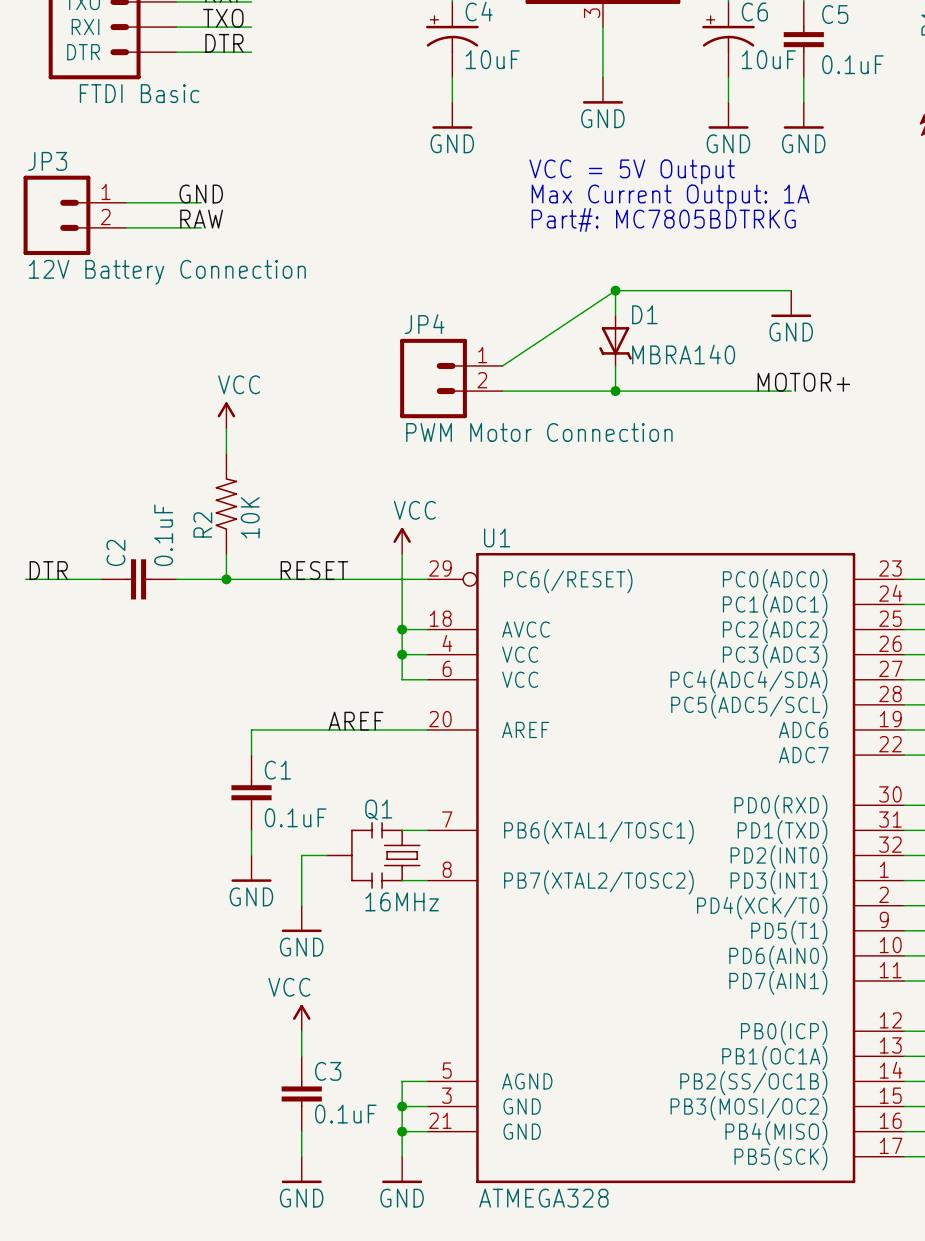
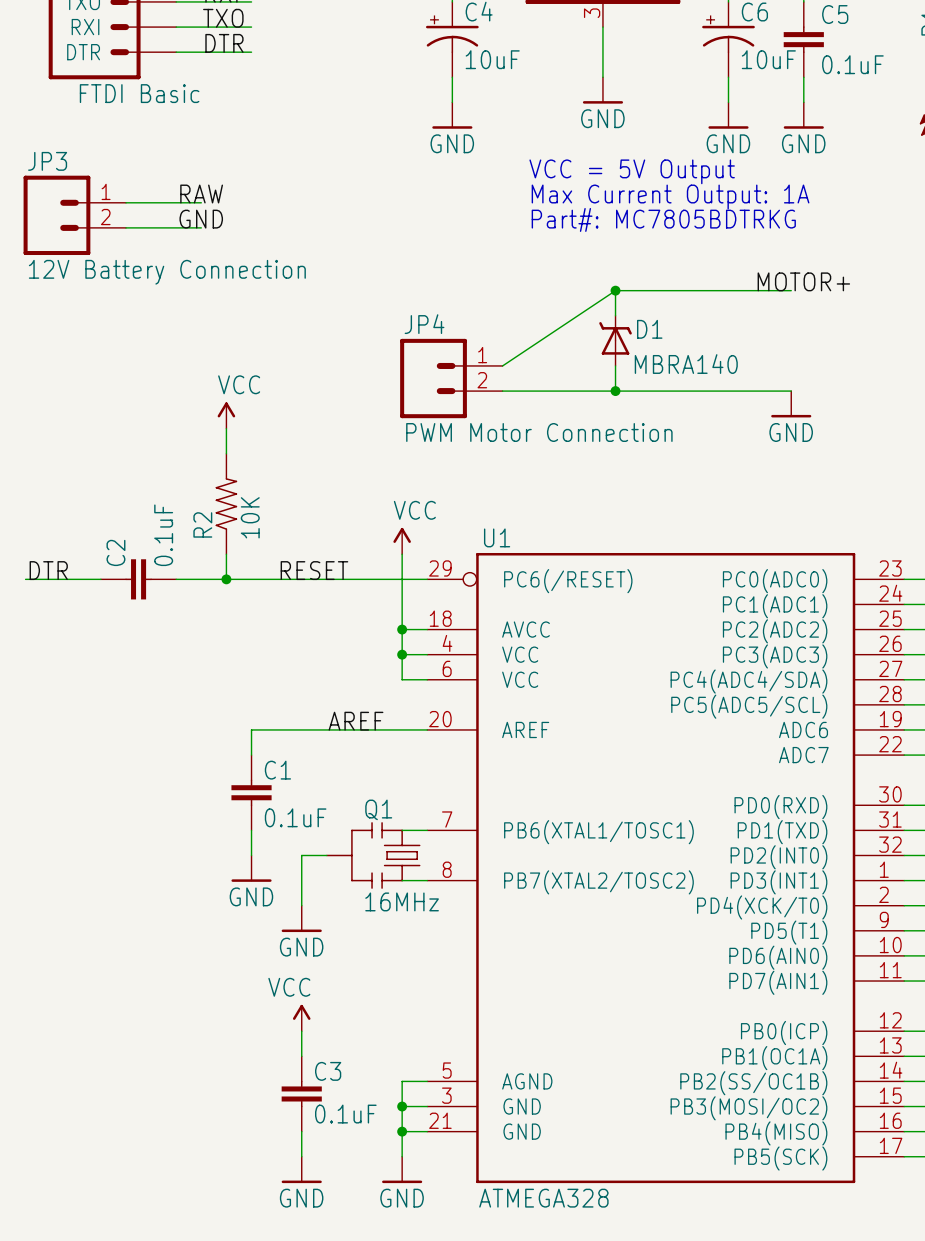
label: GND (201, 194) -> RAW (201, 194)
label: RAW (201, 219) -> GND (201, 219)
power symbol position: GND (791, 303) -> GND (791, 404)
D1 rotation: 0° (615, 343) -> 180° (615, 338)
label position: MOTOR+ (803, 382) -> MOTOR+ (803, 281)

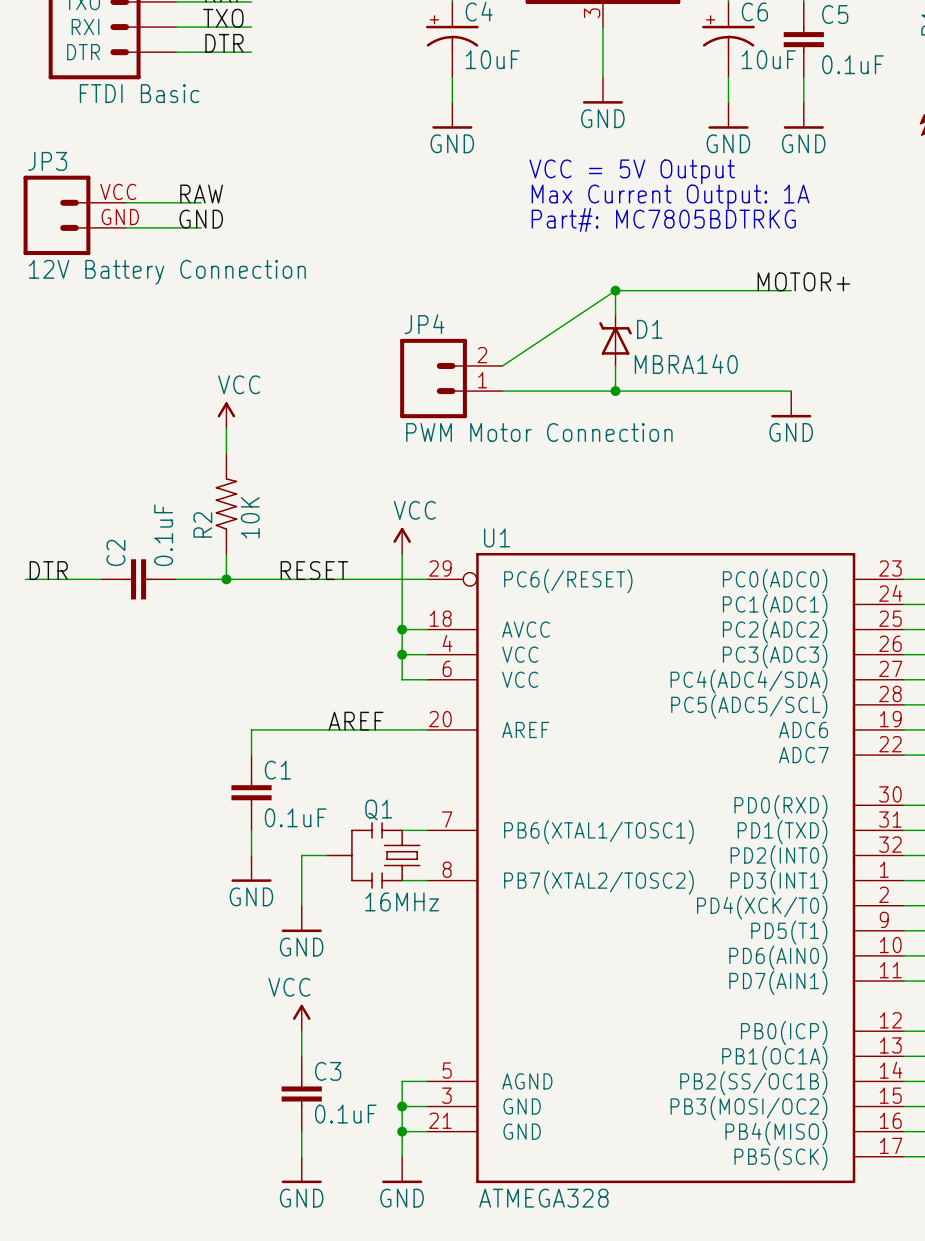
JP3 pin number: 1 (106, 191) -> VCC (118, 191)
JP3 pin number: 2 (105, 217) -> GND (120, 217)
JP4 flip: as is (433, 378) -> up-down (433, 378)

